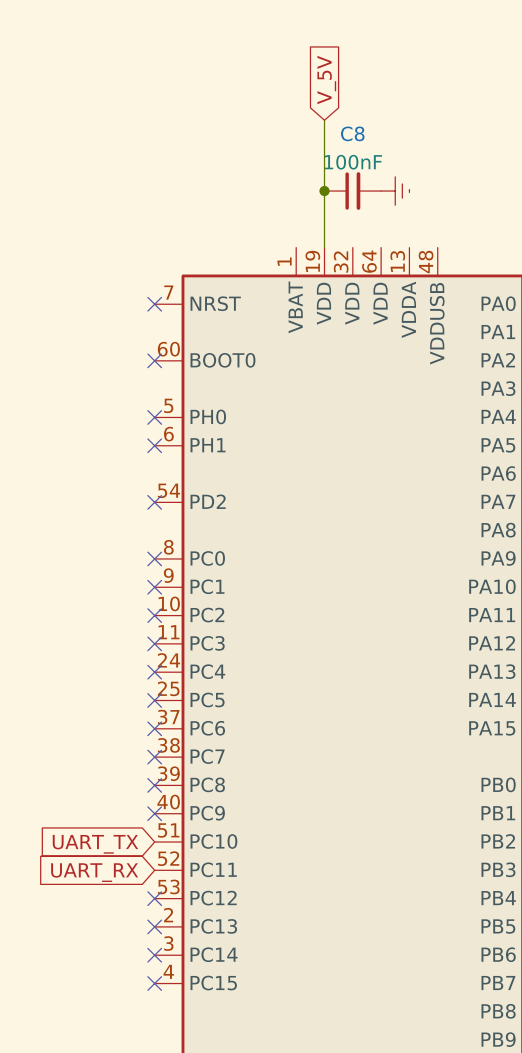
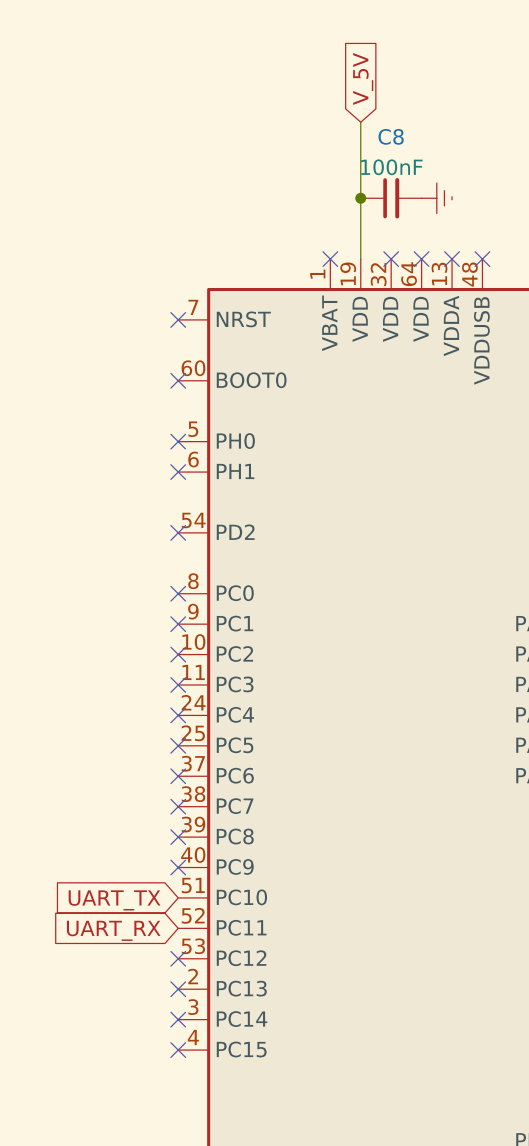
no-connect mark: none -> (330, 259)
no-connect mark: none -> (391, 259)
no-connect mark: none -> (421, 259)
no-connect mark: none -> (452, 259)
no-connect mark: none -> (482, 259)

